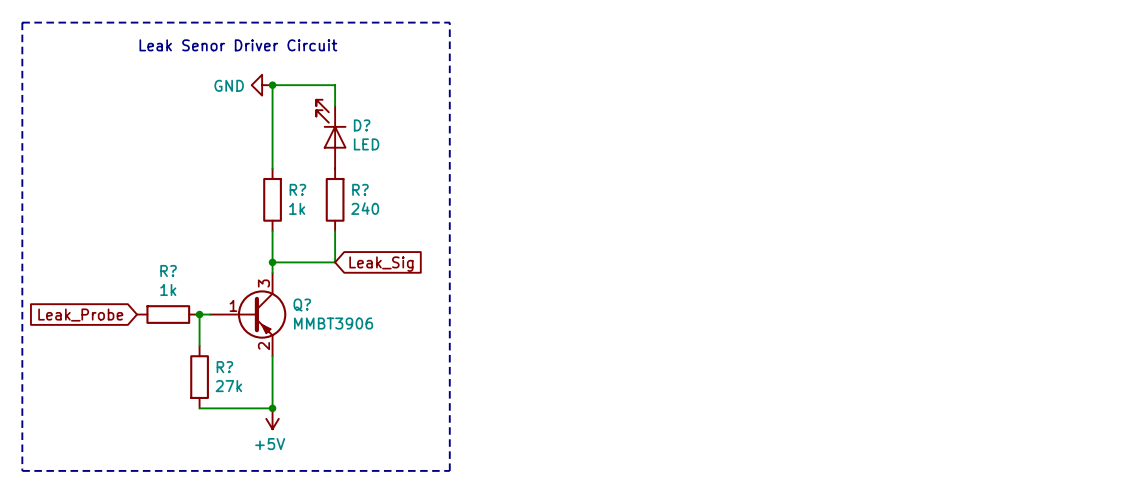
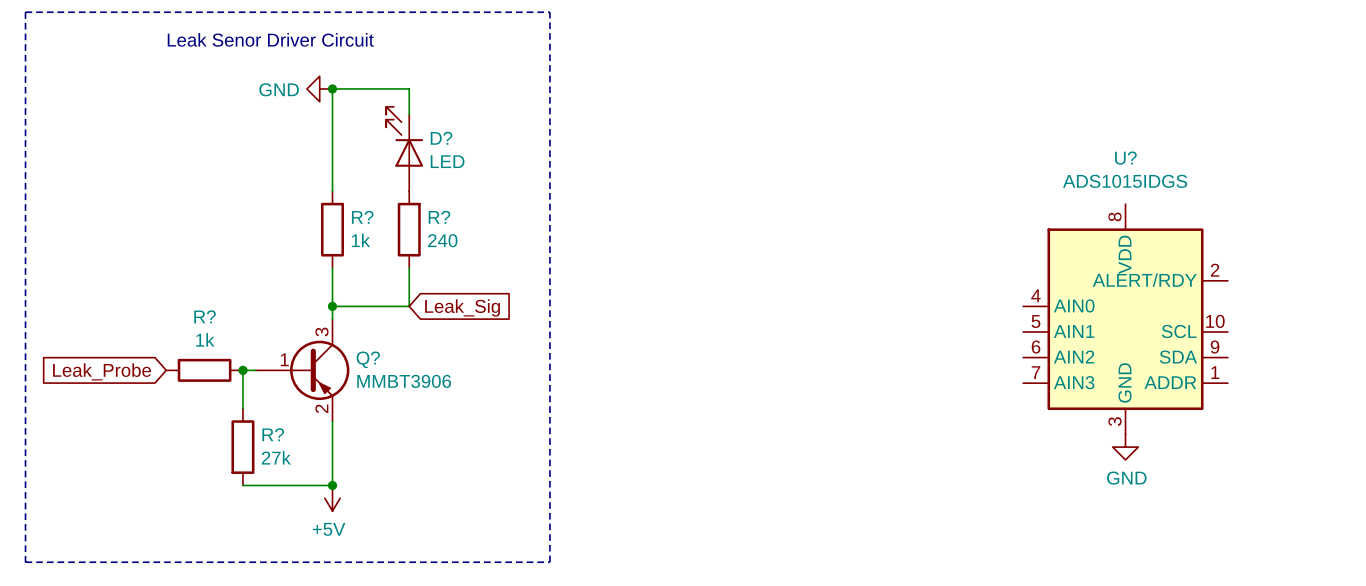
U?: none -> ADS1015IDGS (1125, 319)
power symbol: none -> GND (1125, 447)

